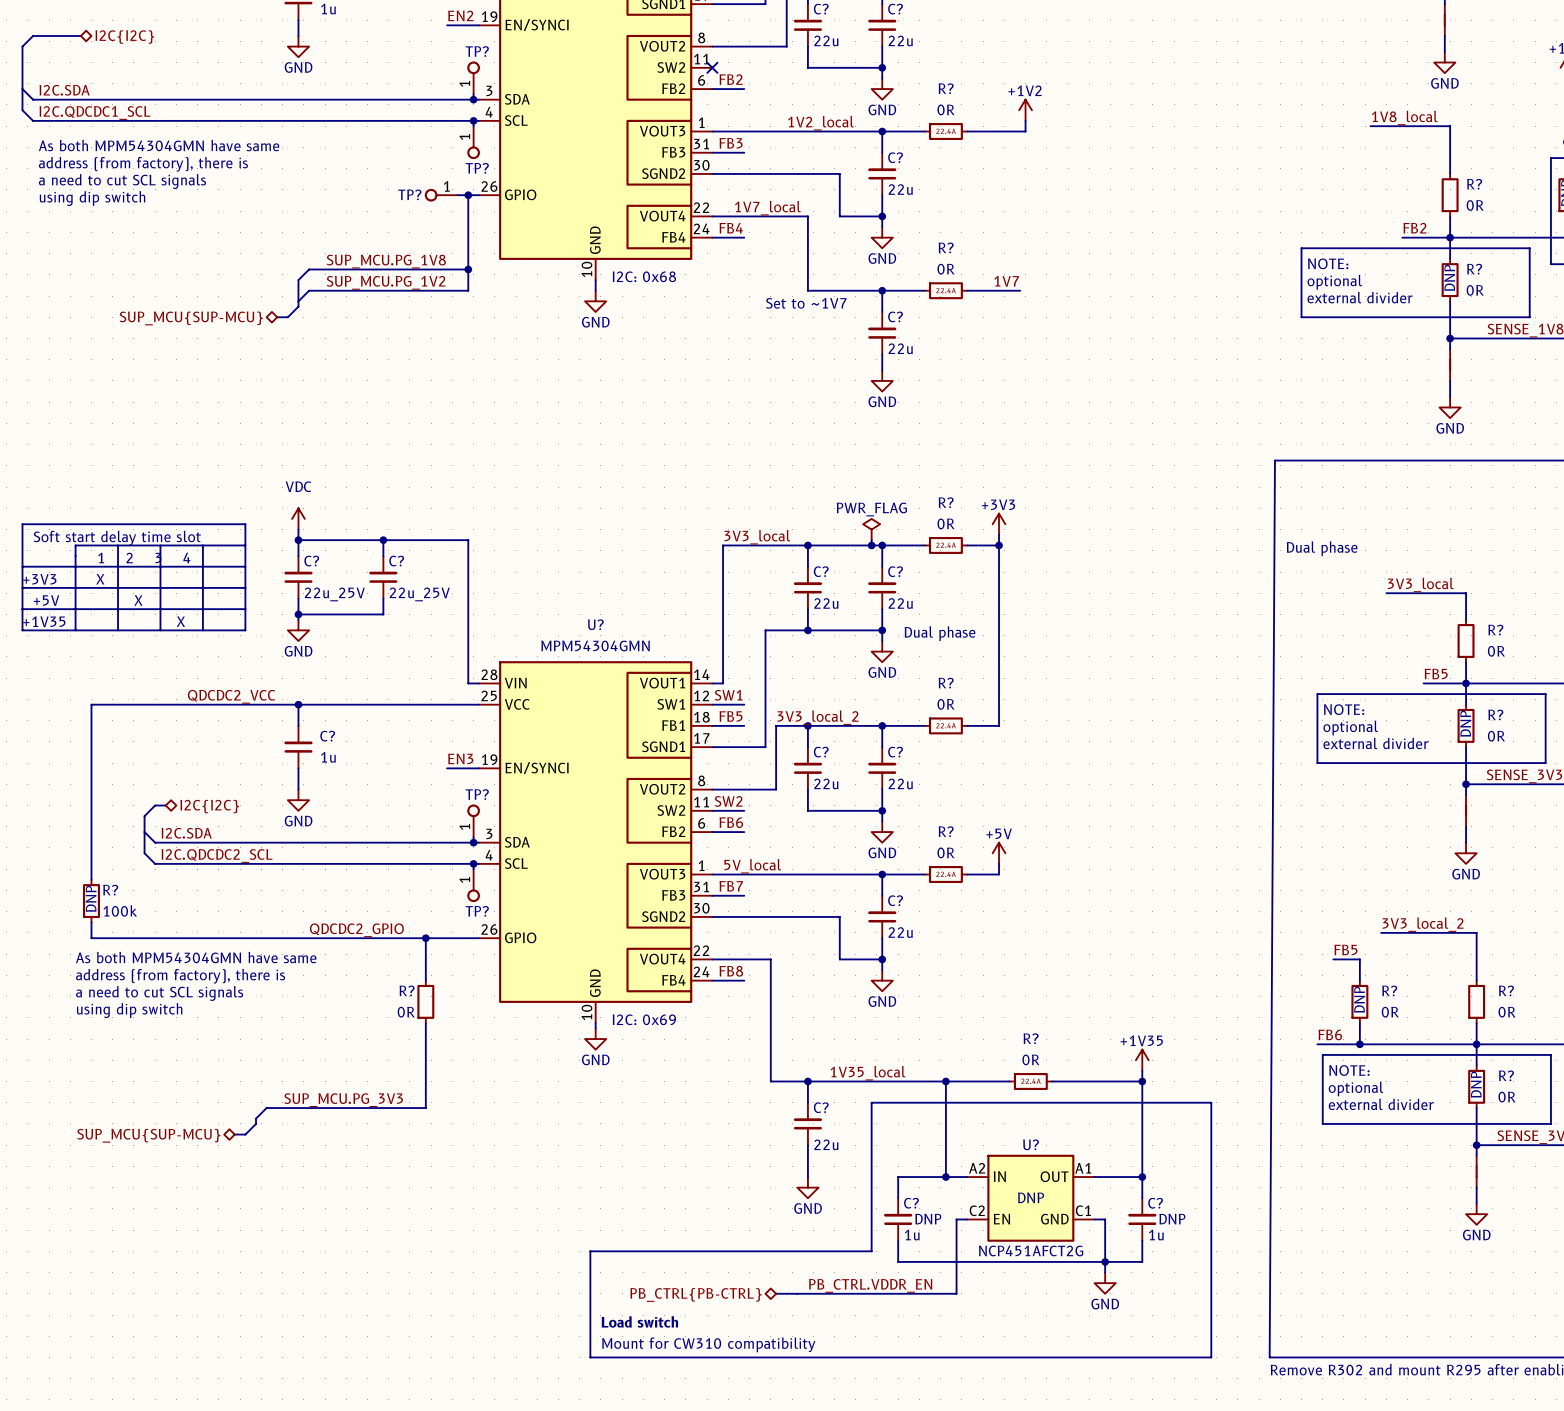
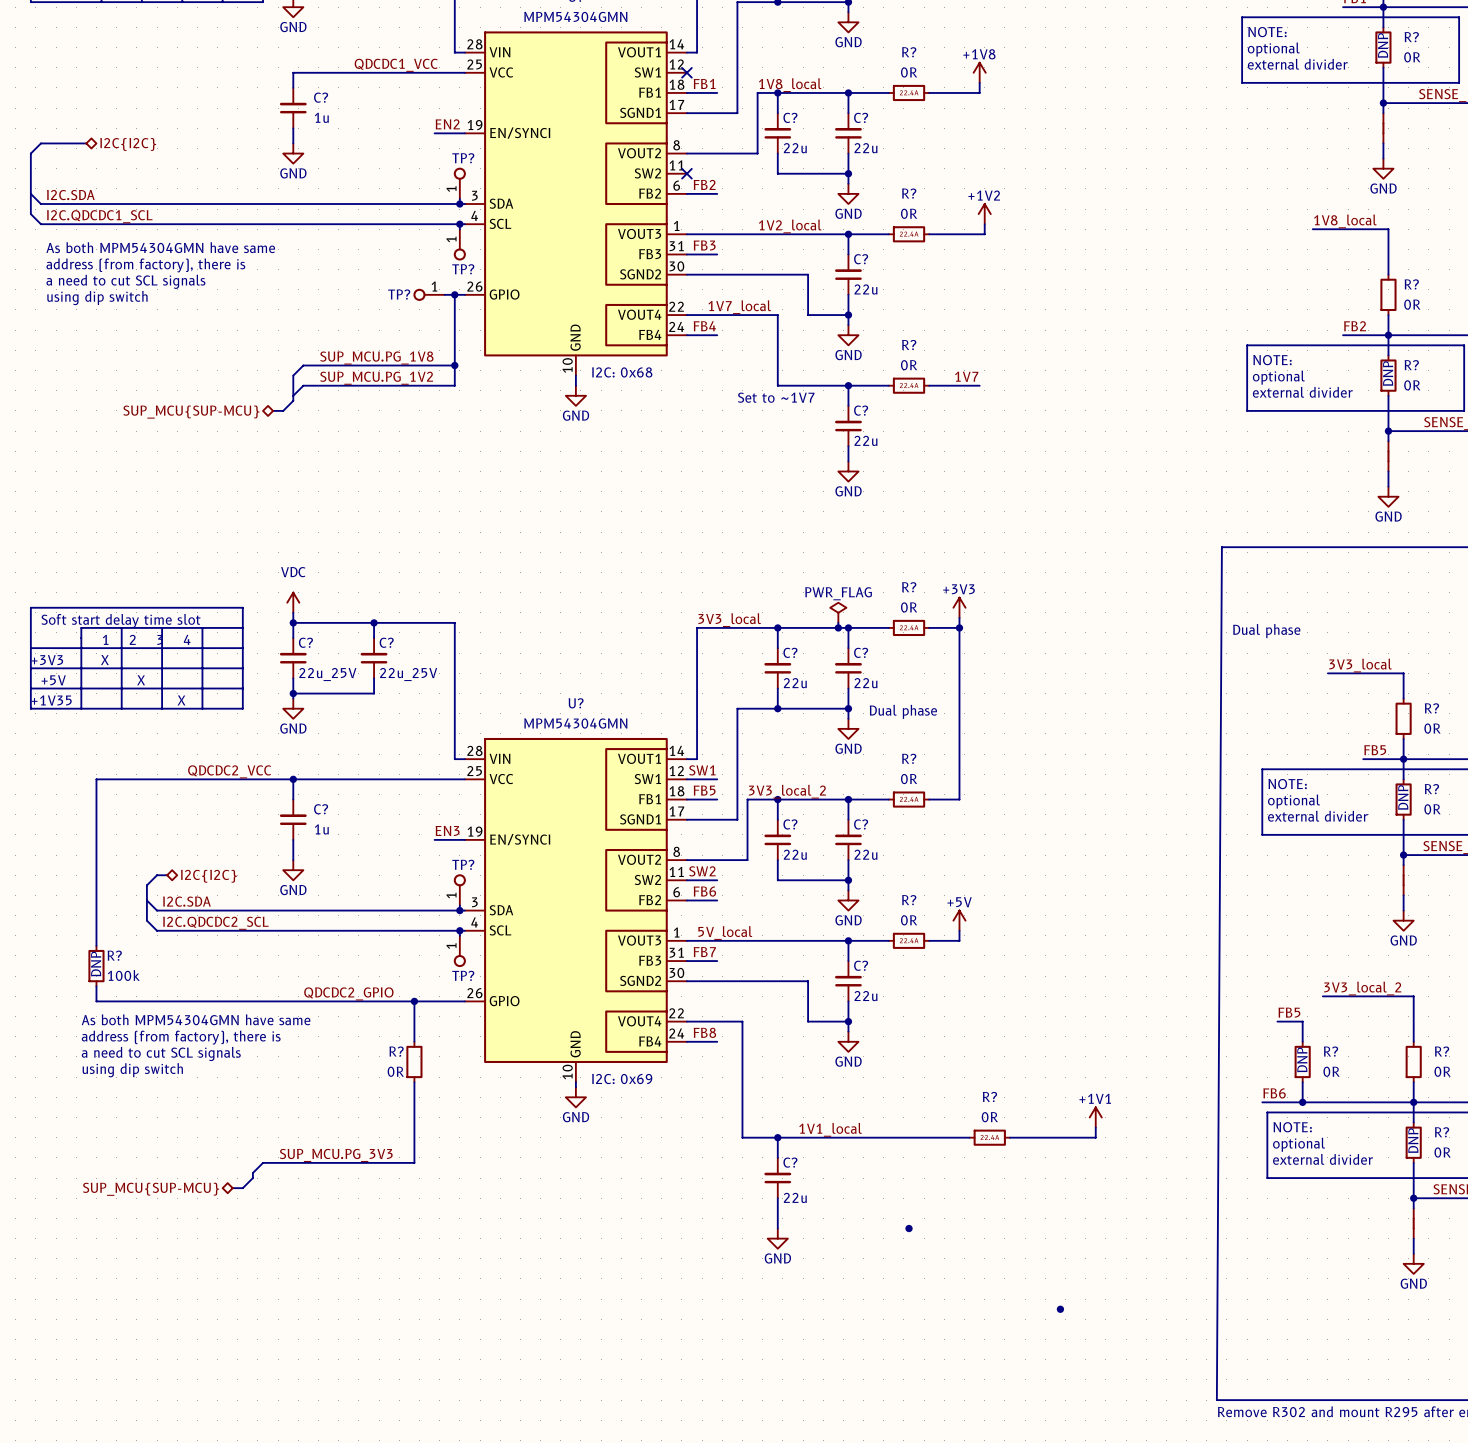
power symbol: +1V35 (1142, 1060) -> +1V1 (1095, 1117)
label: 1V35_local (868, 1073) -> 1V1_local (830, 1129)
wire: (945, 1081) (945, 1177) -> none
junction: (945, 1081) -> none
wire: (1142, 1081) (1142, 1198) -> none
junction: (1142, 1081) -> none
line: (871, 1102) (1211, 1102) (1211, 1357) (590, 1357) (590, 1251) (871, 1251) (871, 1102) -> none
wire: (967, 1177) (898, 1177) (898, 1198) -> none
wire: (1094, 1177) (1142, 1177) -> none
junction: (1142, 1177) -> none
U?: NCP451AFCT2G (1030, 1198) -> none
C?: (898, 1219) -> none
wire: (967, 1219) (956, 1219) (956, 1293) (786, 1293) -> none
wire: (1094, 1219) (1105, 1219) (1105, 1272) -> none
C?: (1142, 1219) -> none
wire: (898, 1240) (898, 1261) (1142, 1261) (1142, 1240) -> none
power symbol: GND (1105, 1283) -> none
label: PB_CTRL.VDDR_EN (870, 1285) -> none
bus: (776, 1293) (786, 1293) -> none
hierarchical label: PB_CTRL{PB-CTRL} (696, 1294) -> none
text: Load switch (639, 1321) -> none
text: Mount for CW310 compatibility (708, 1344) -> none

